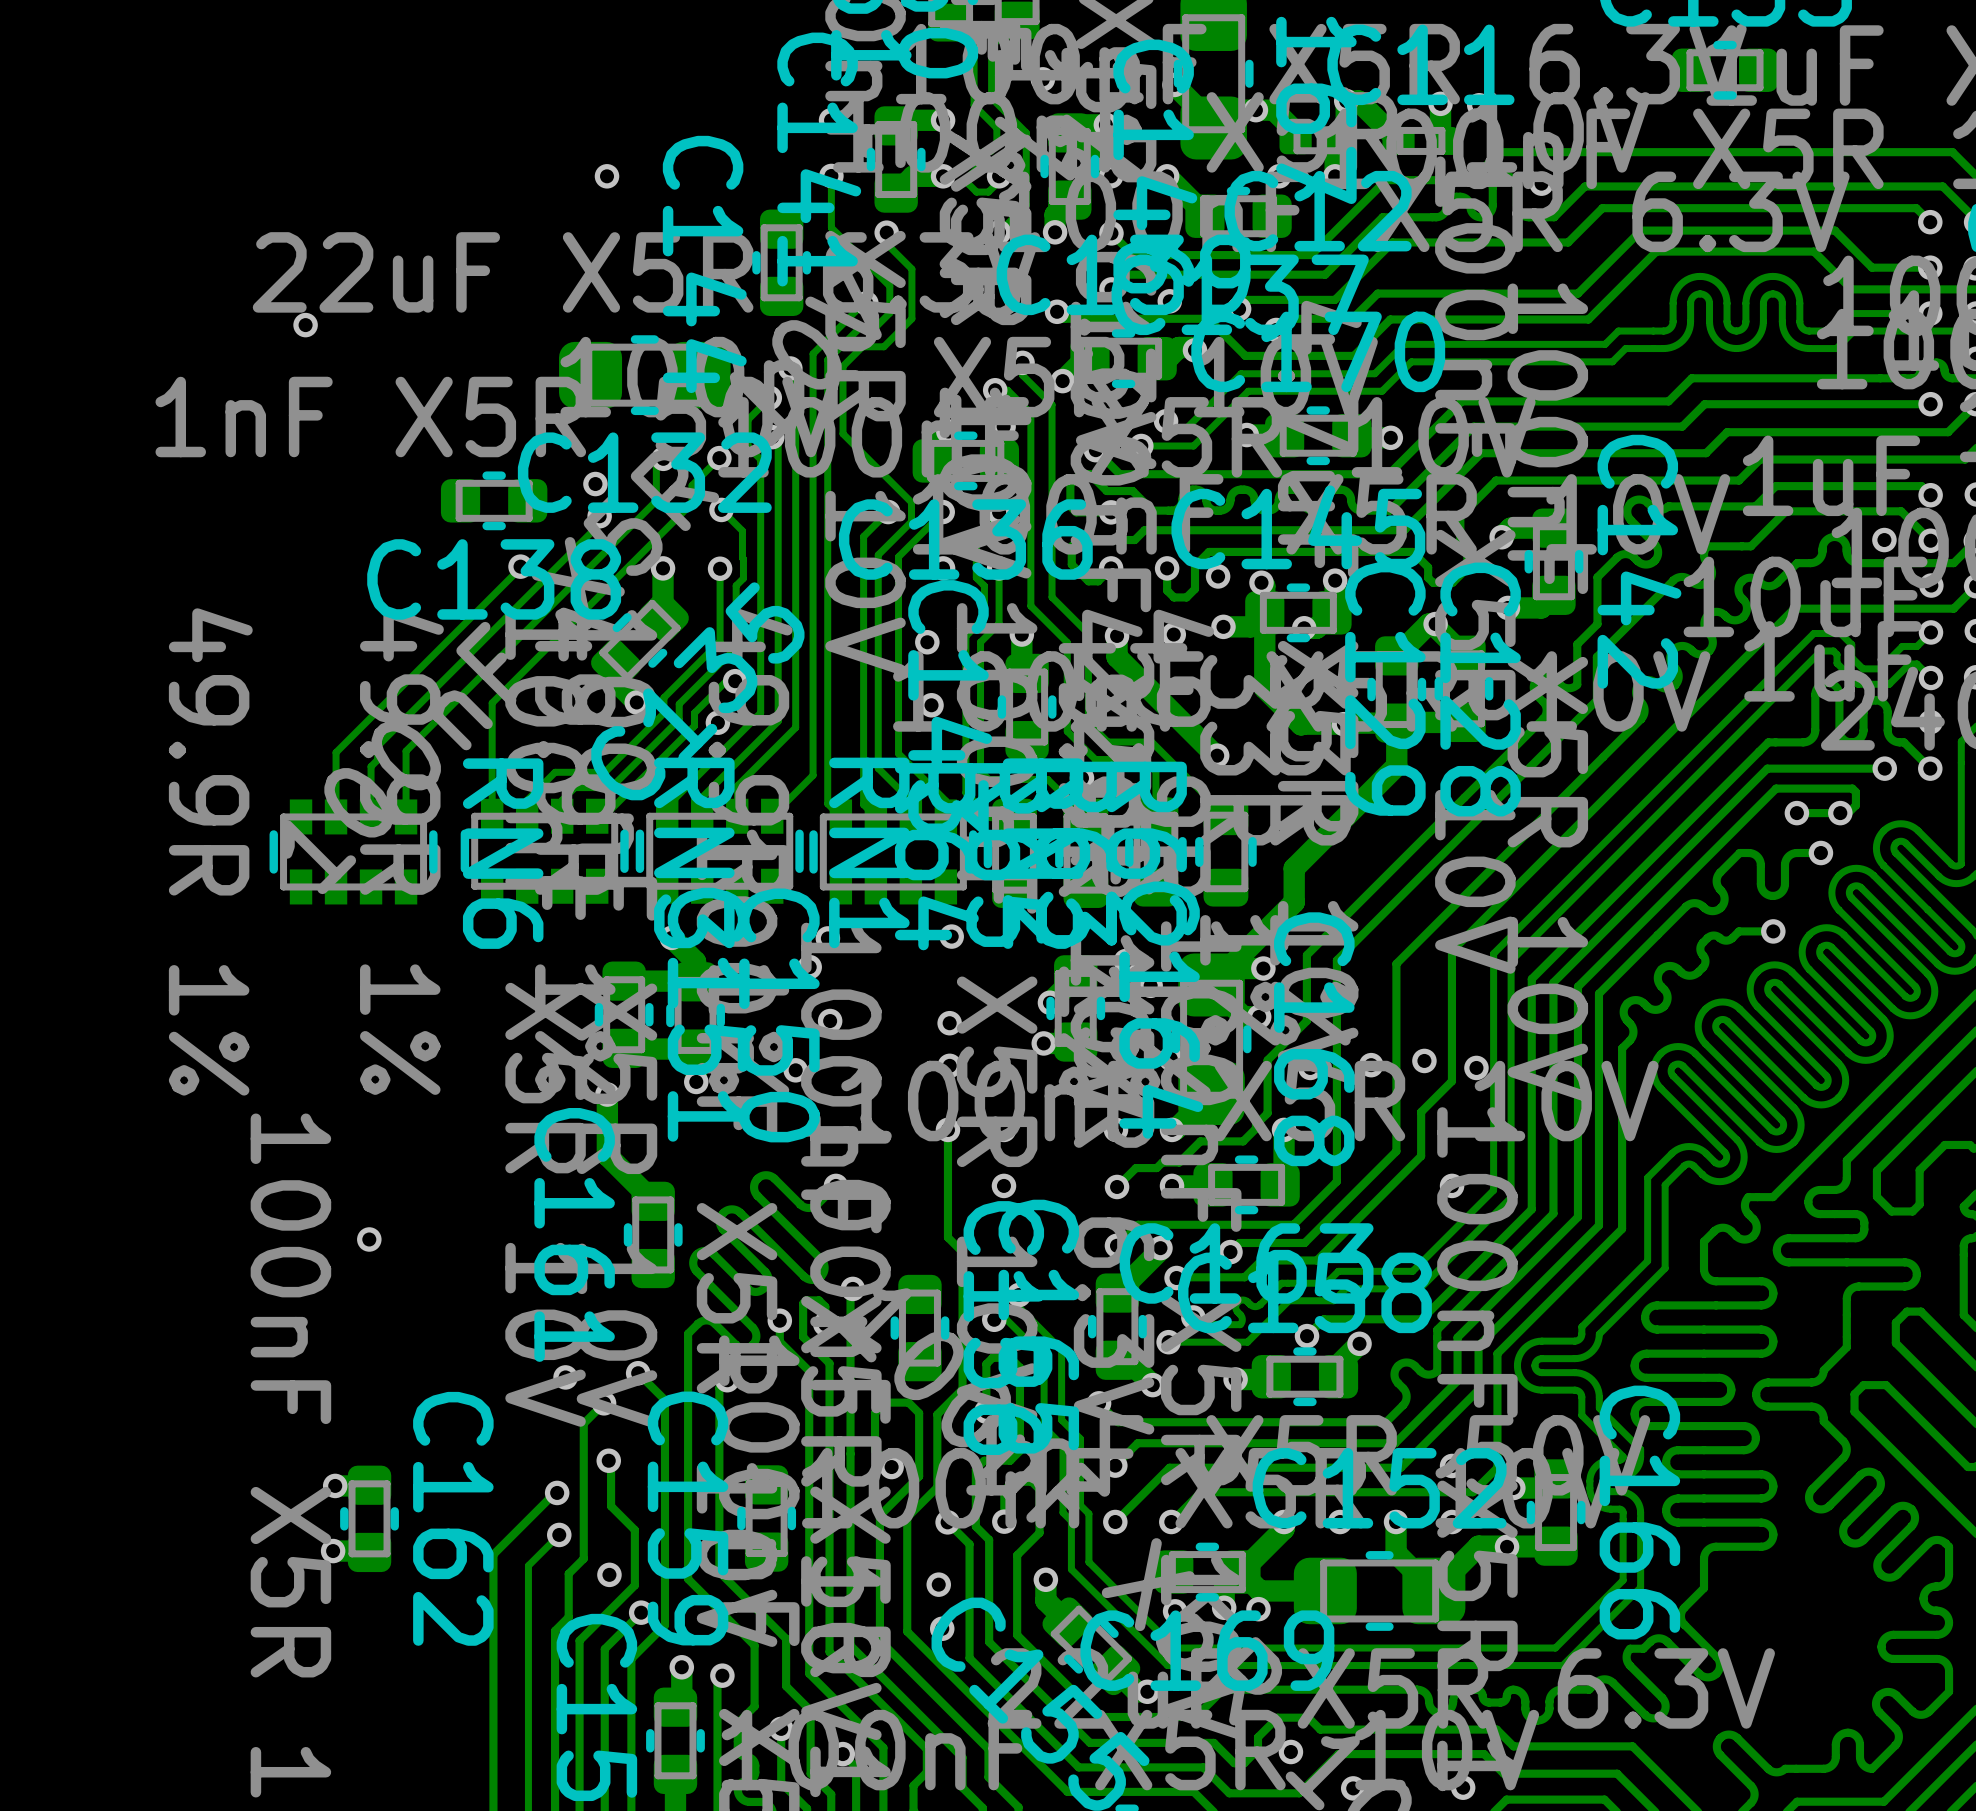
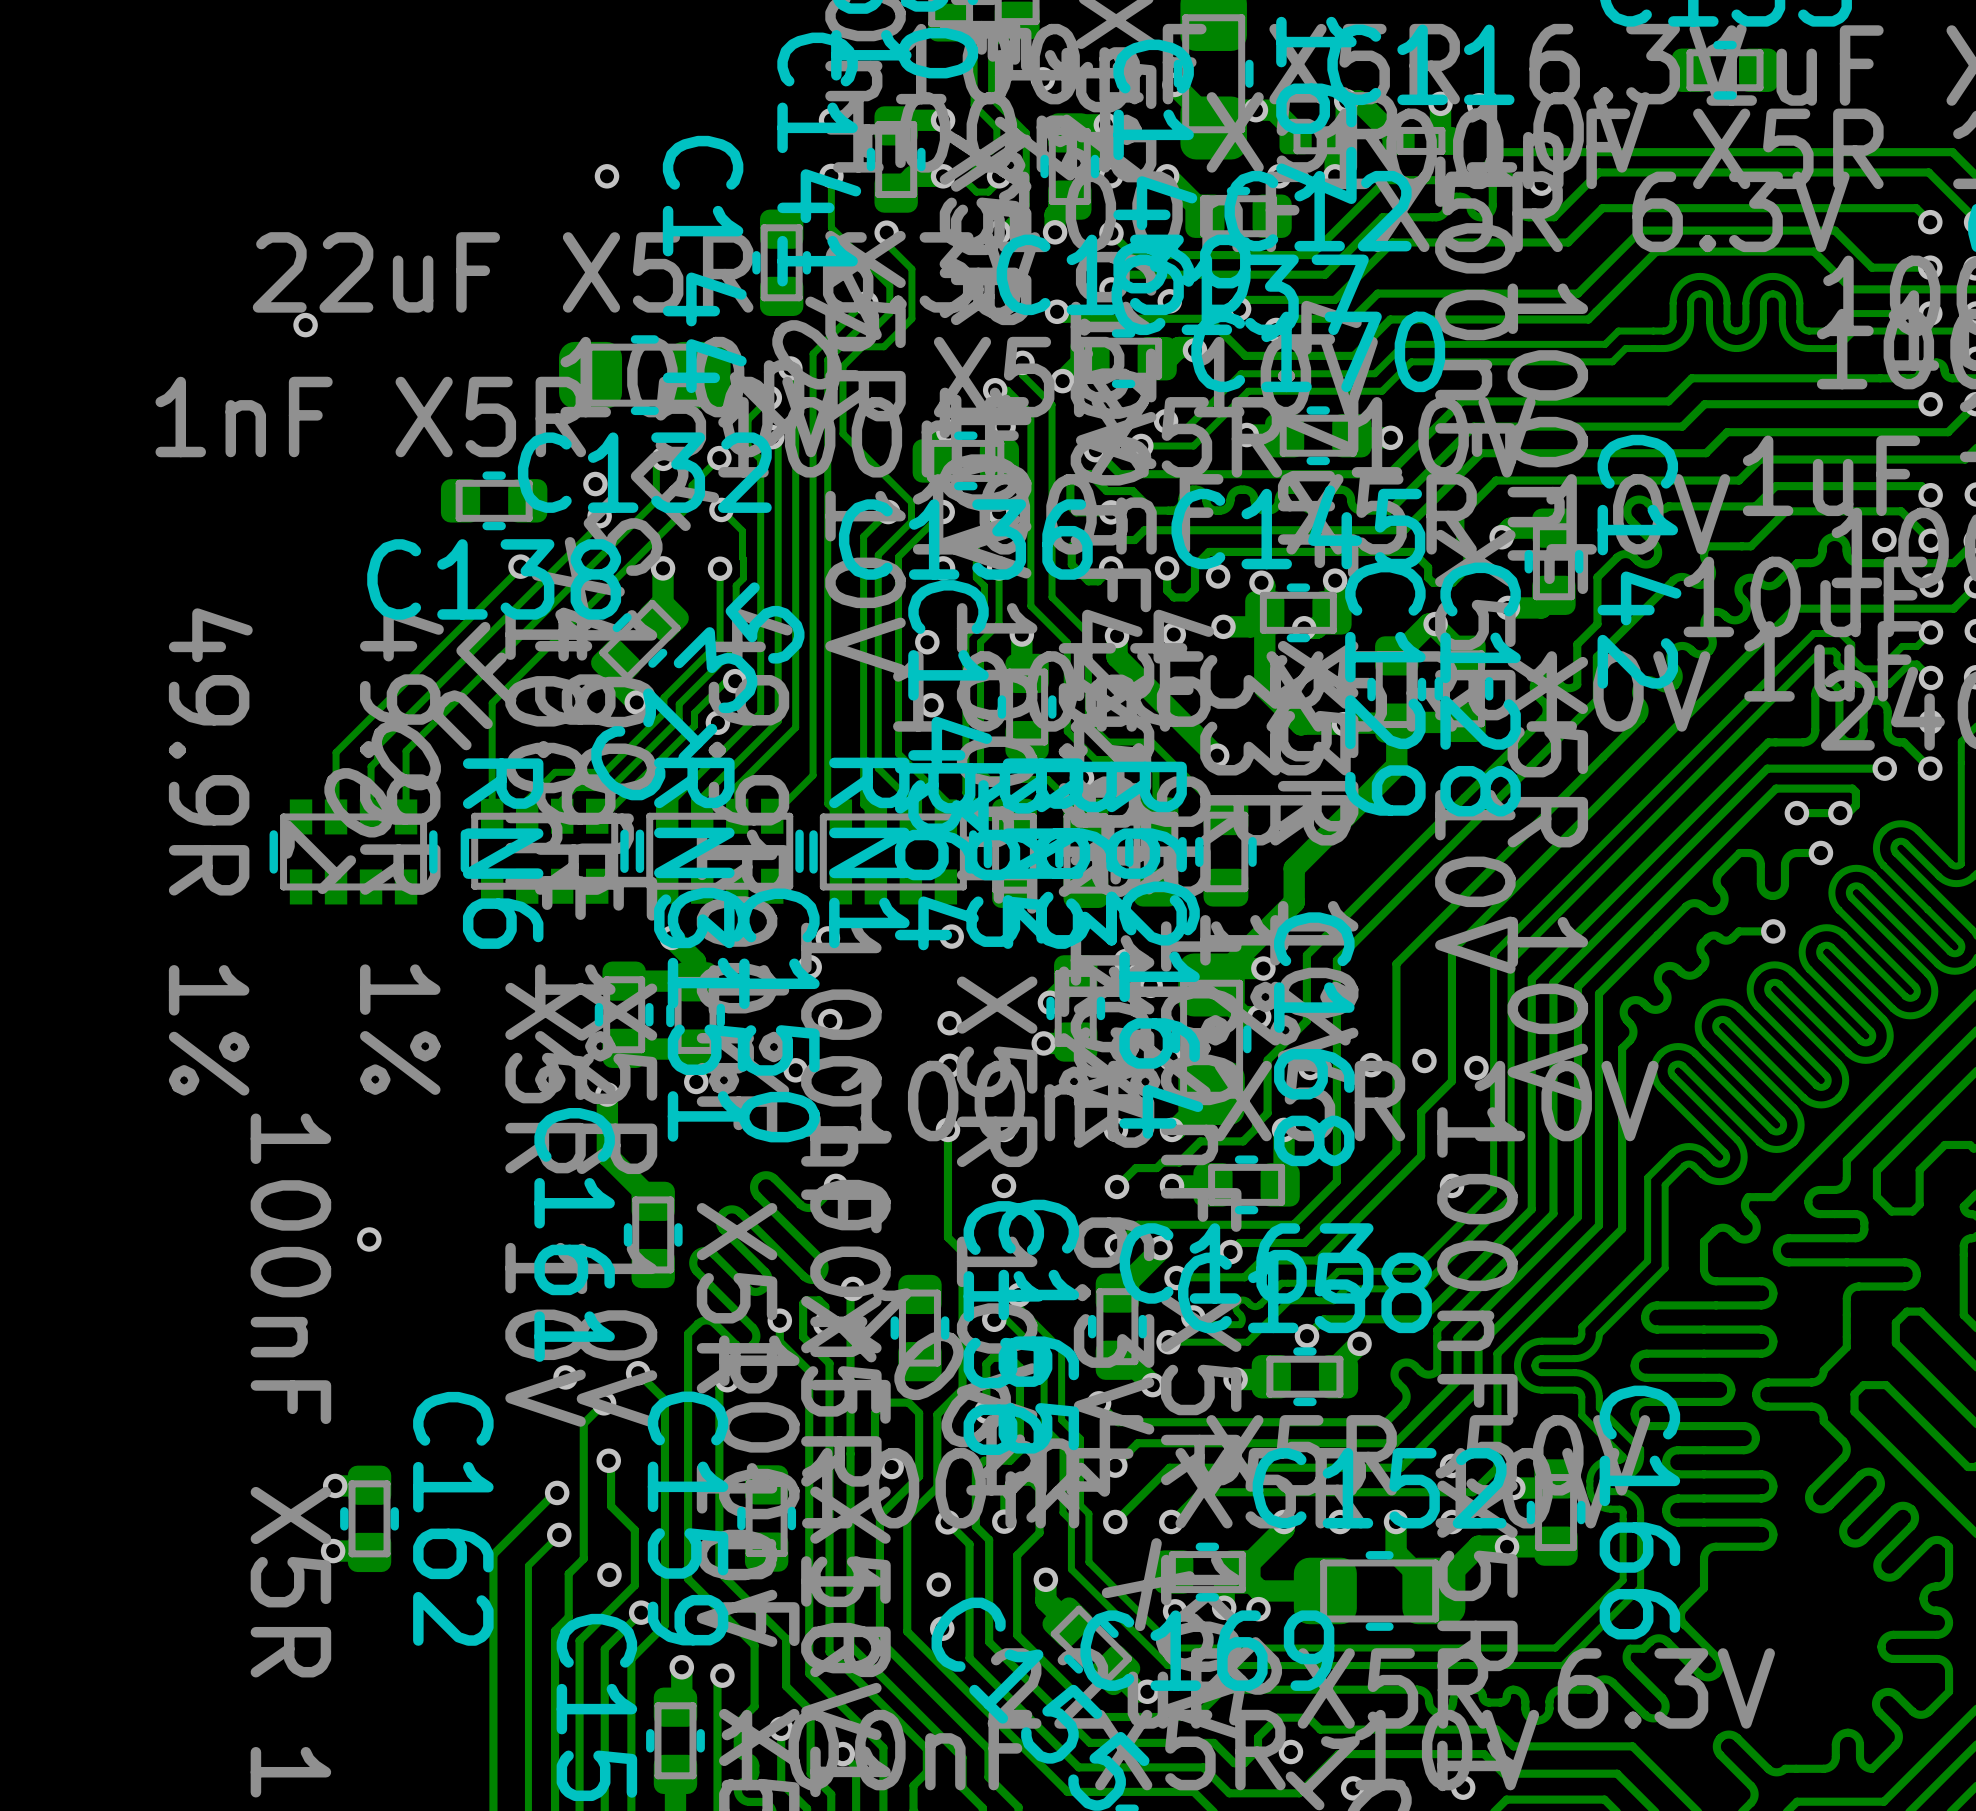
track: (1942, 186) (1584, 186) -> (1942, 186) (1928, 172) (1598, 172) (1584, 186)

